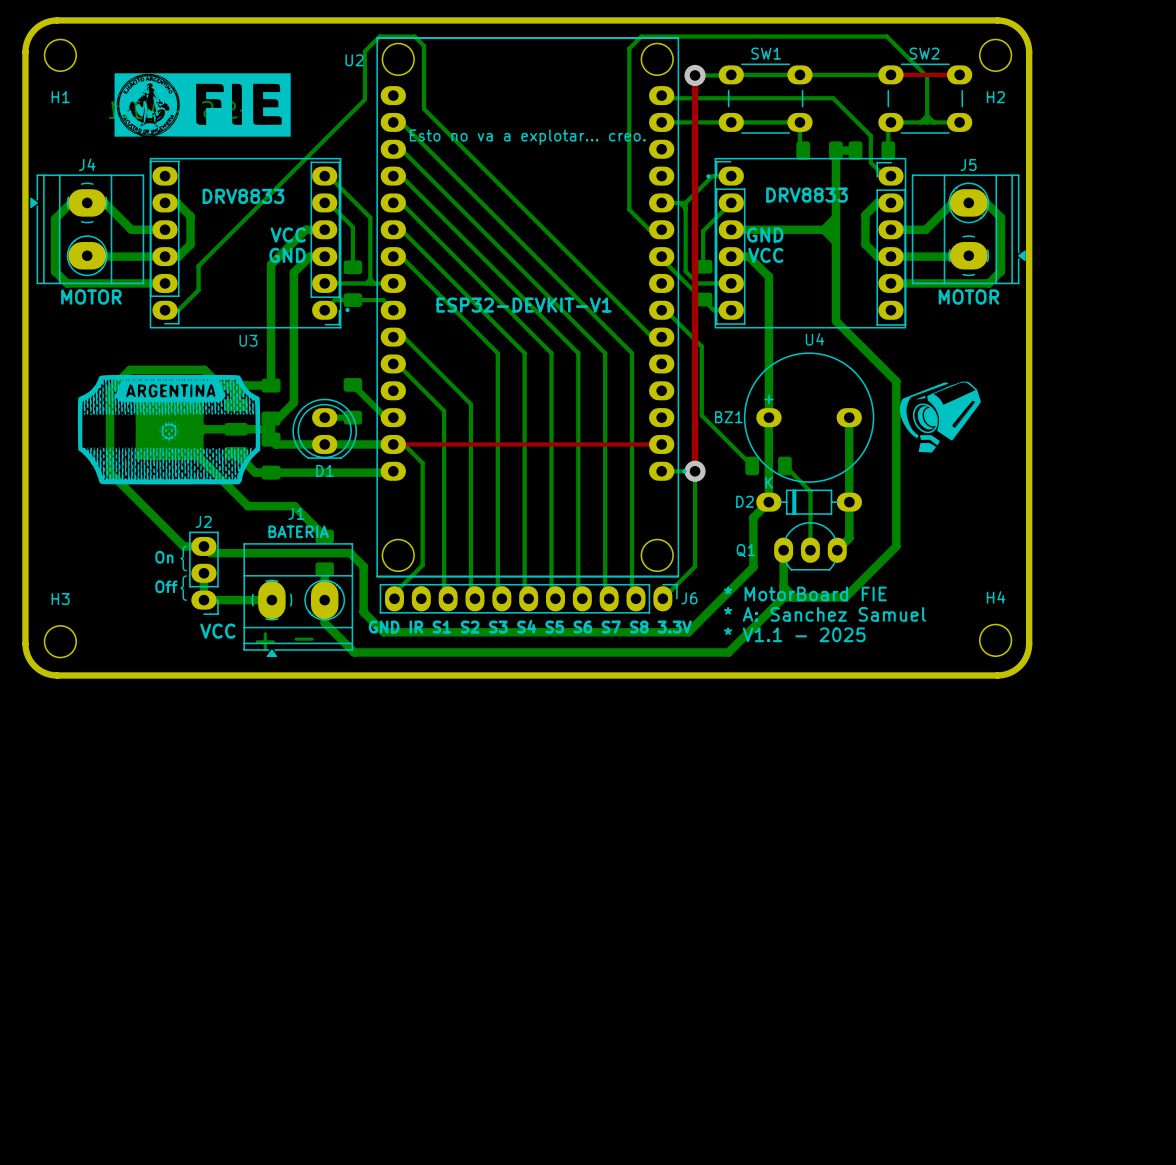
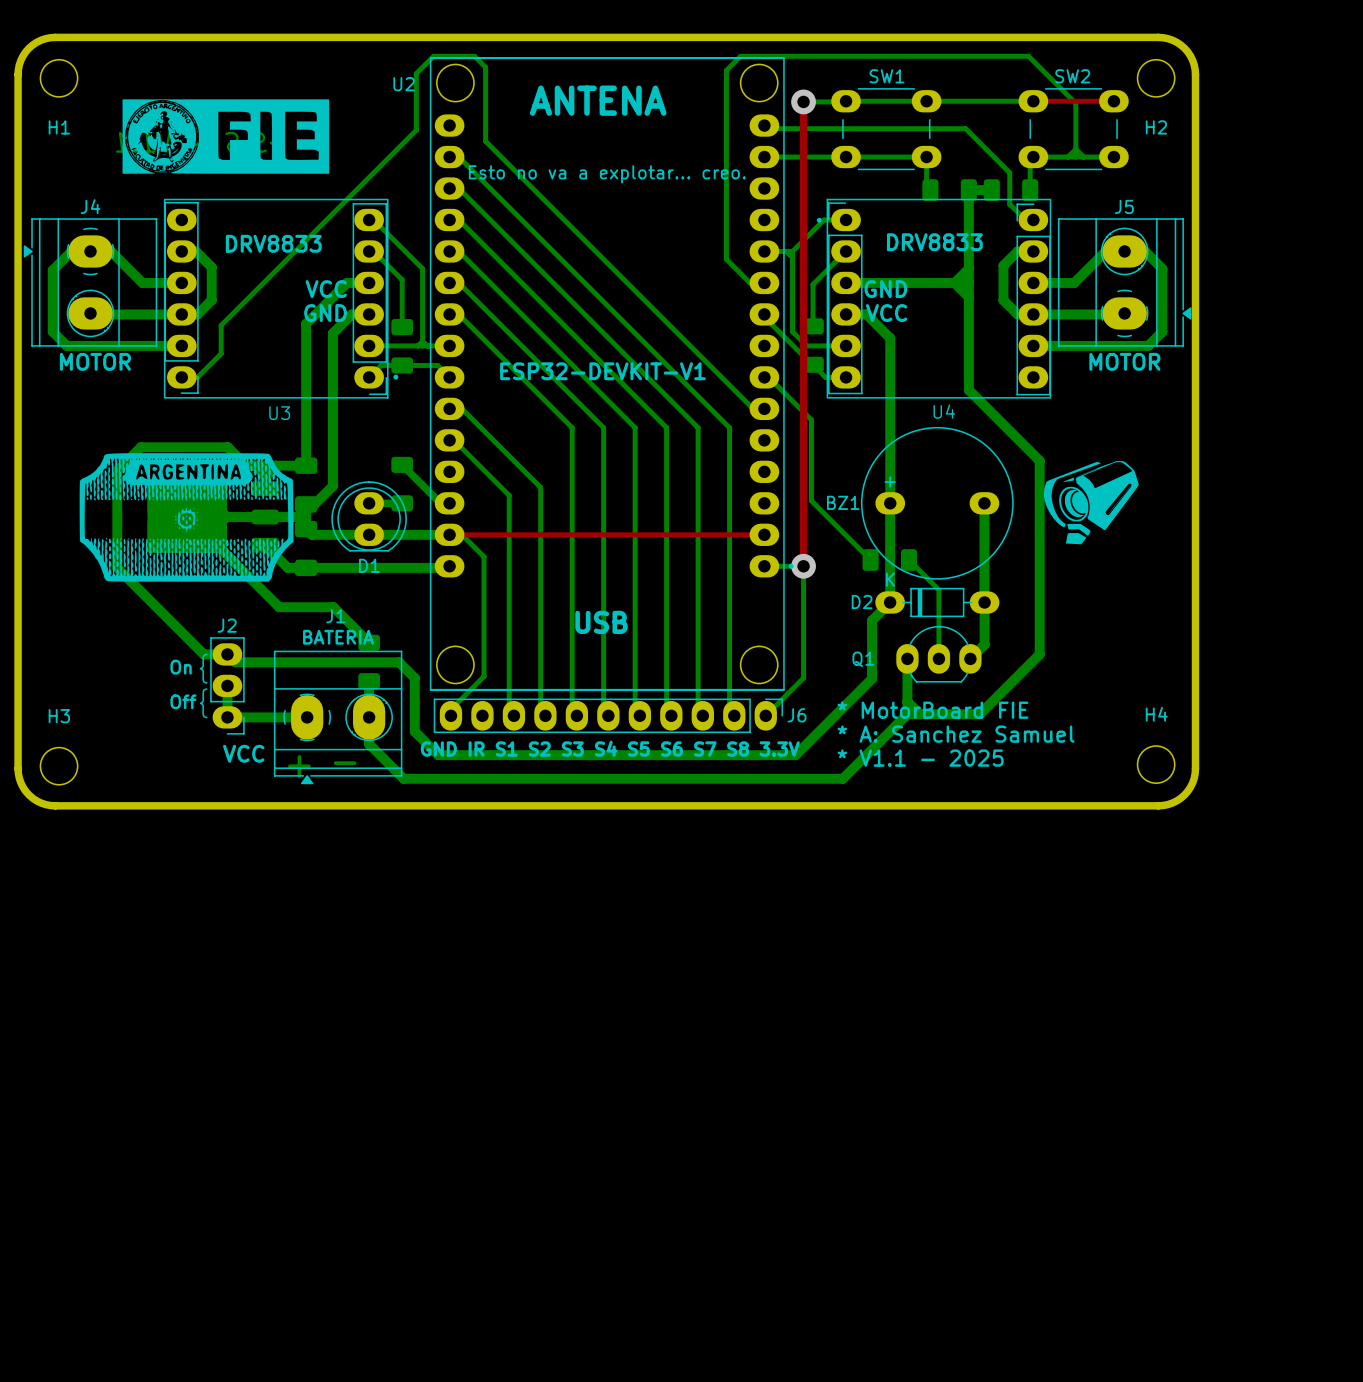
text: none -> ANTENA (598, 100)
text: none -> USB (601, 622)

